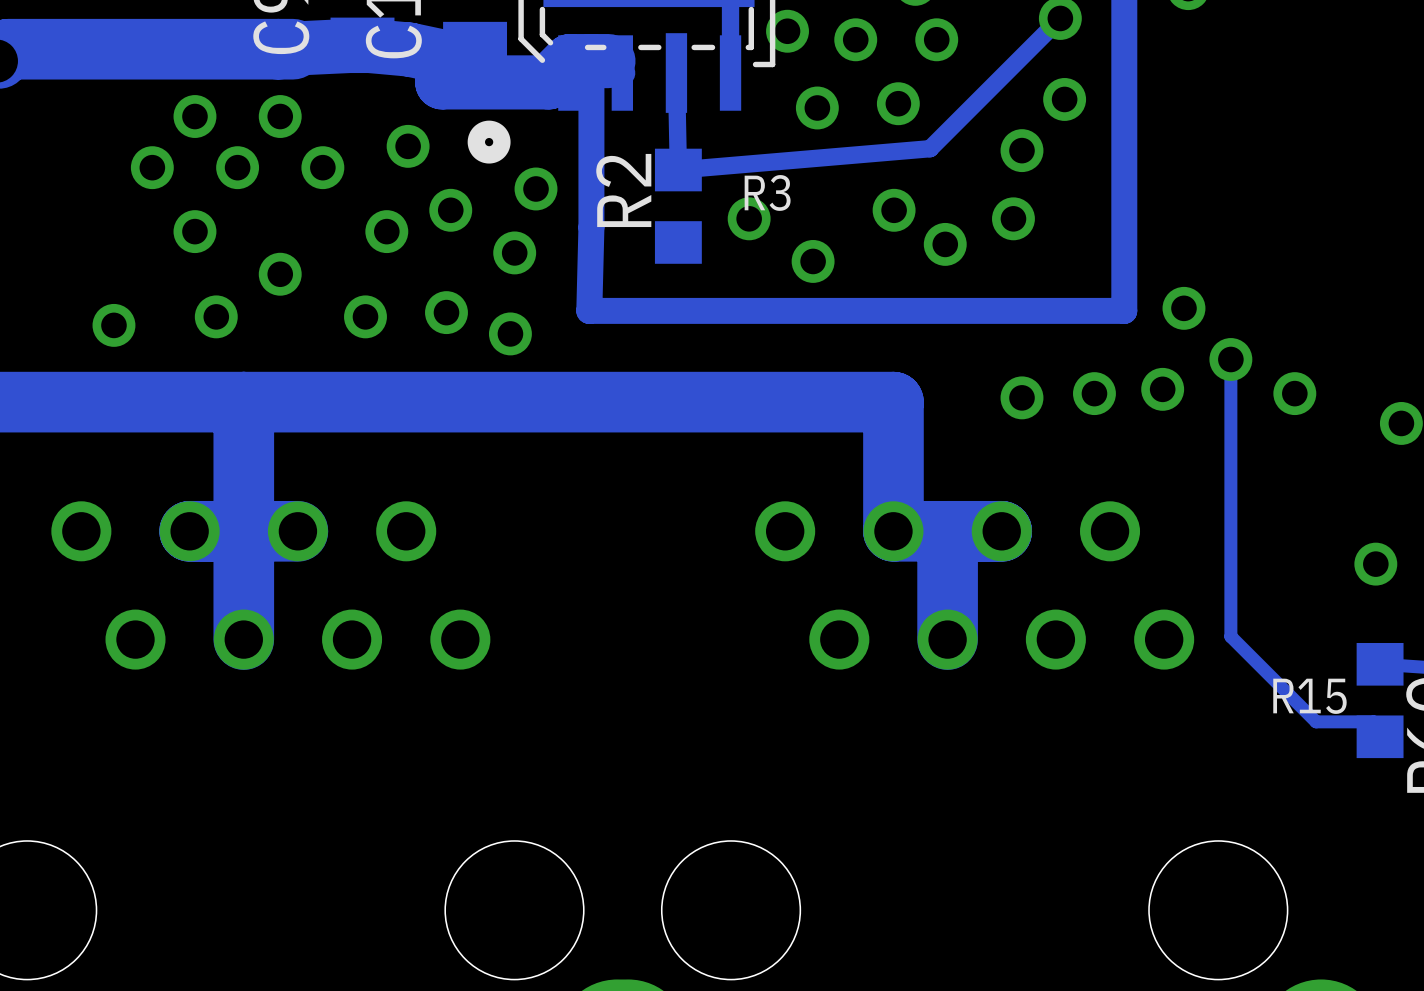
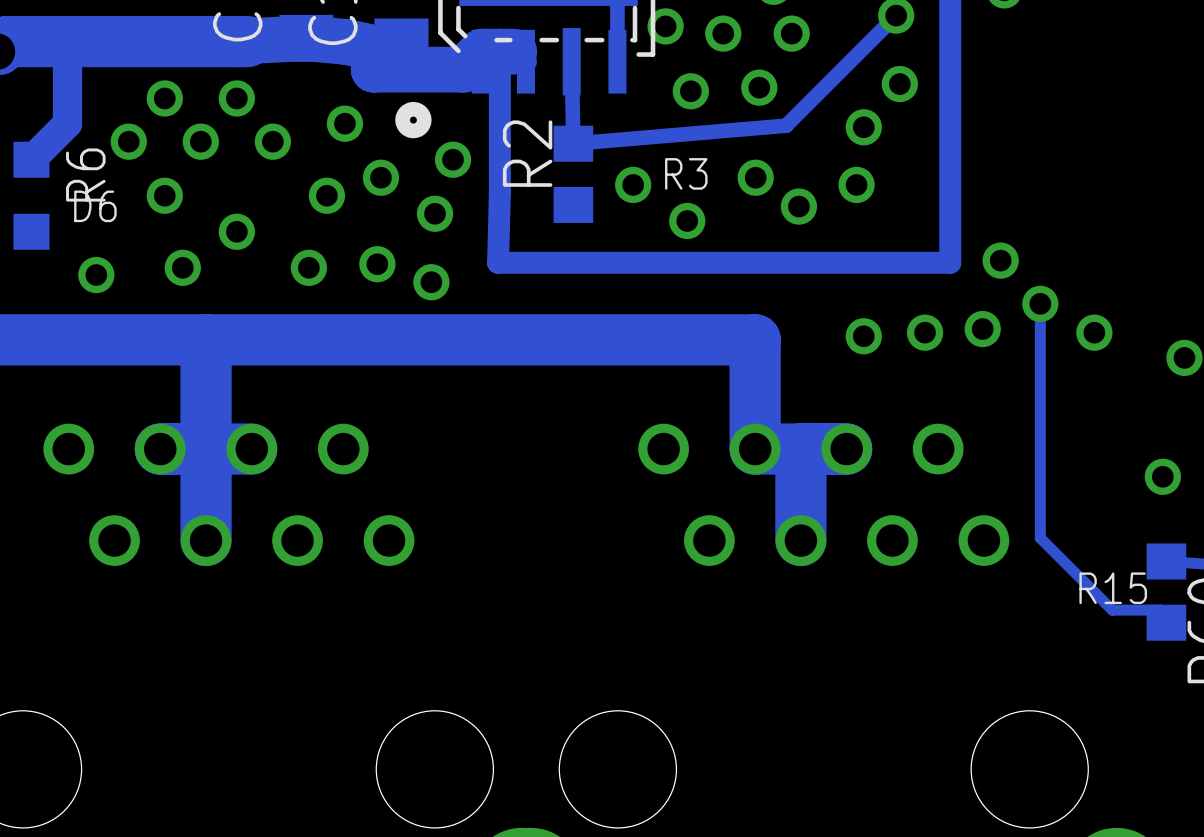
track: none -> (67, 41) (67, 123) (31, 159)
text position: R3 (767, 192) -> R3 (686, 173)
R6: none -> (31, 195)
text: none -> D6 (95, 206)

